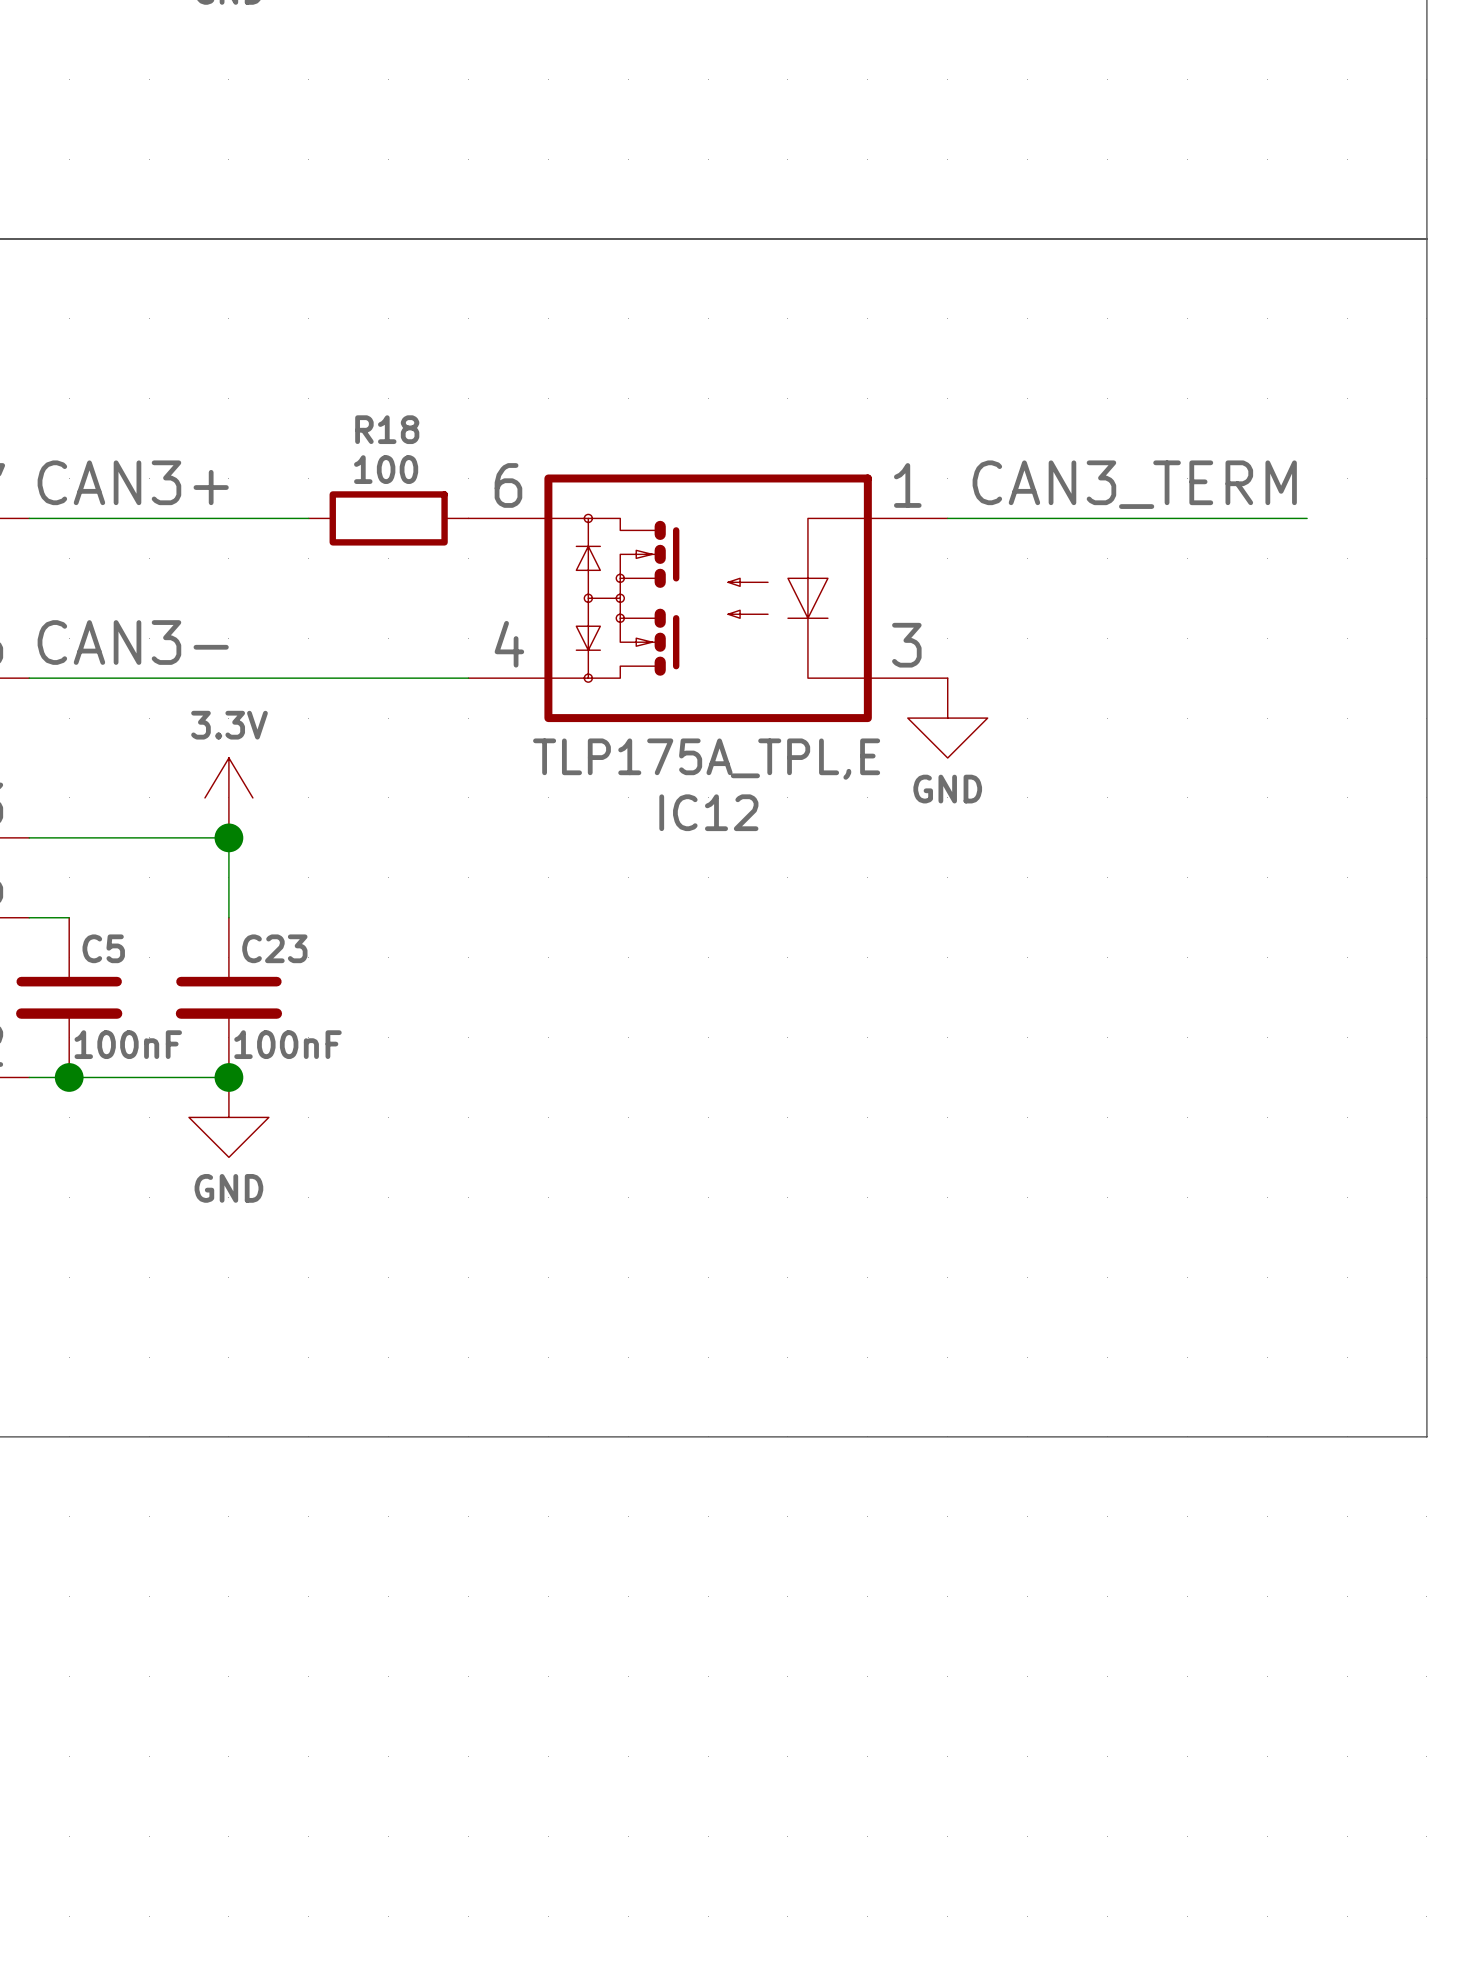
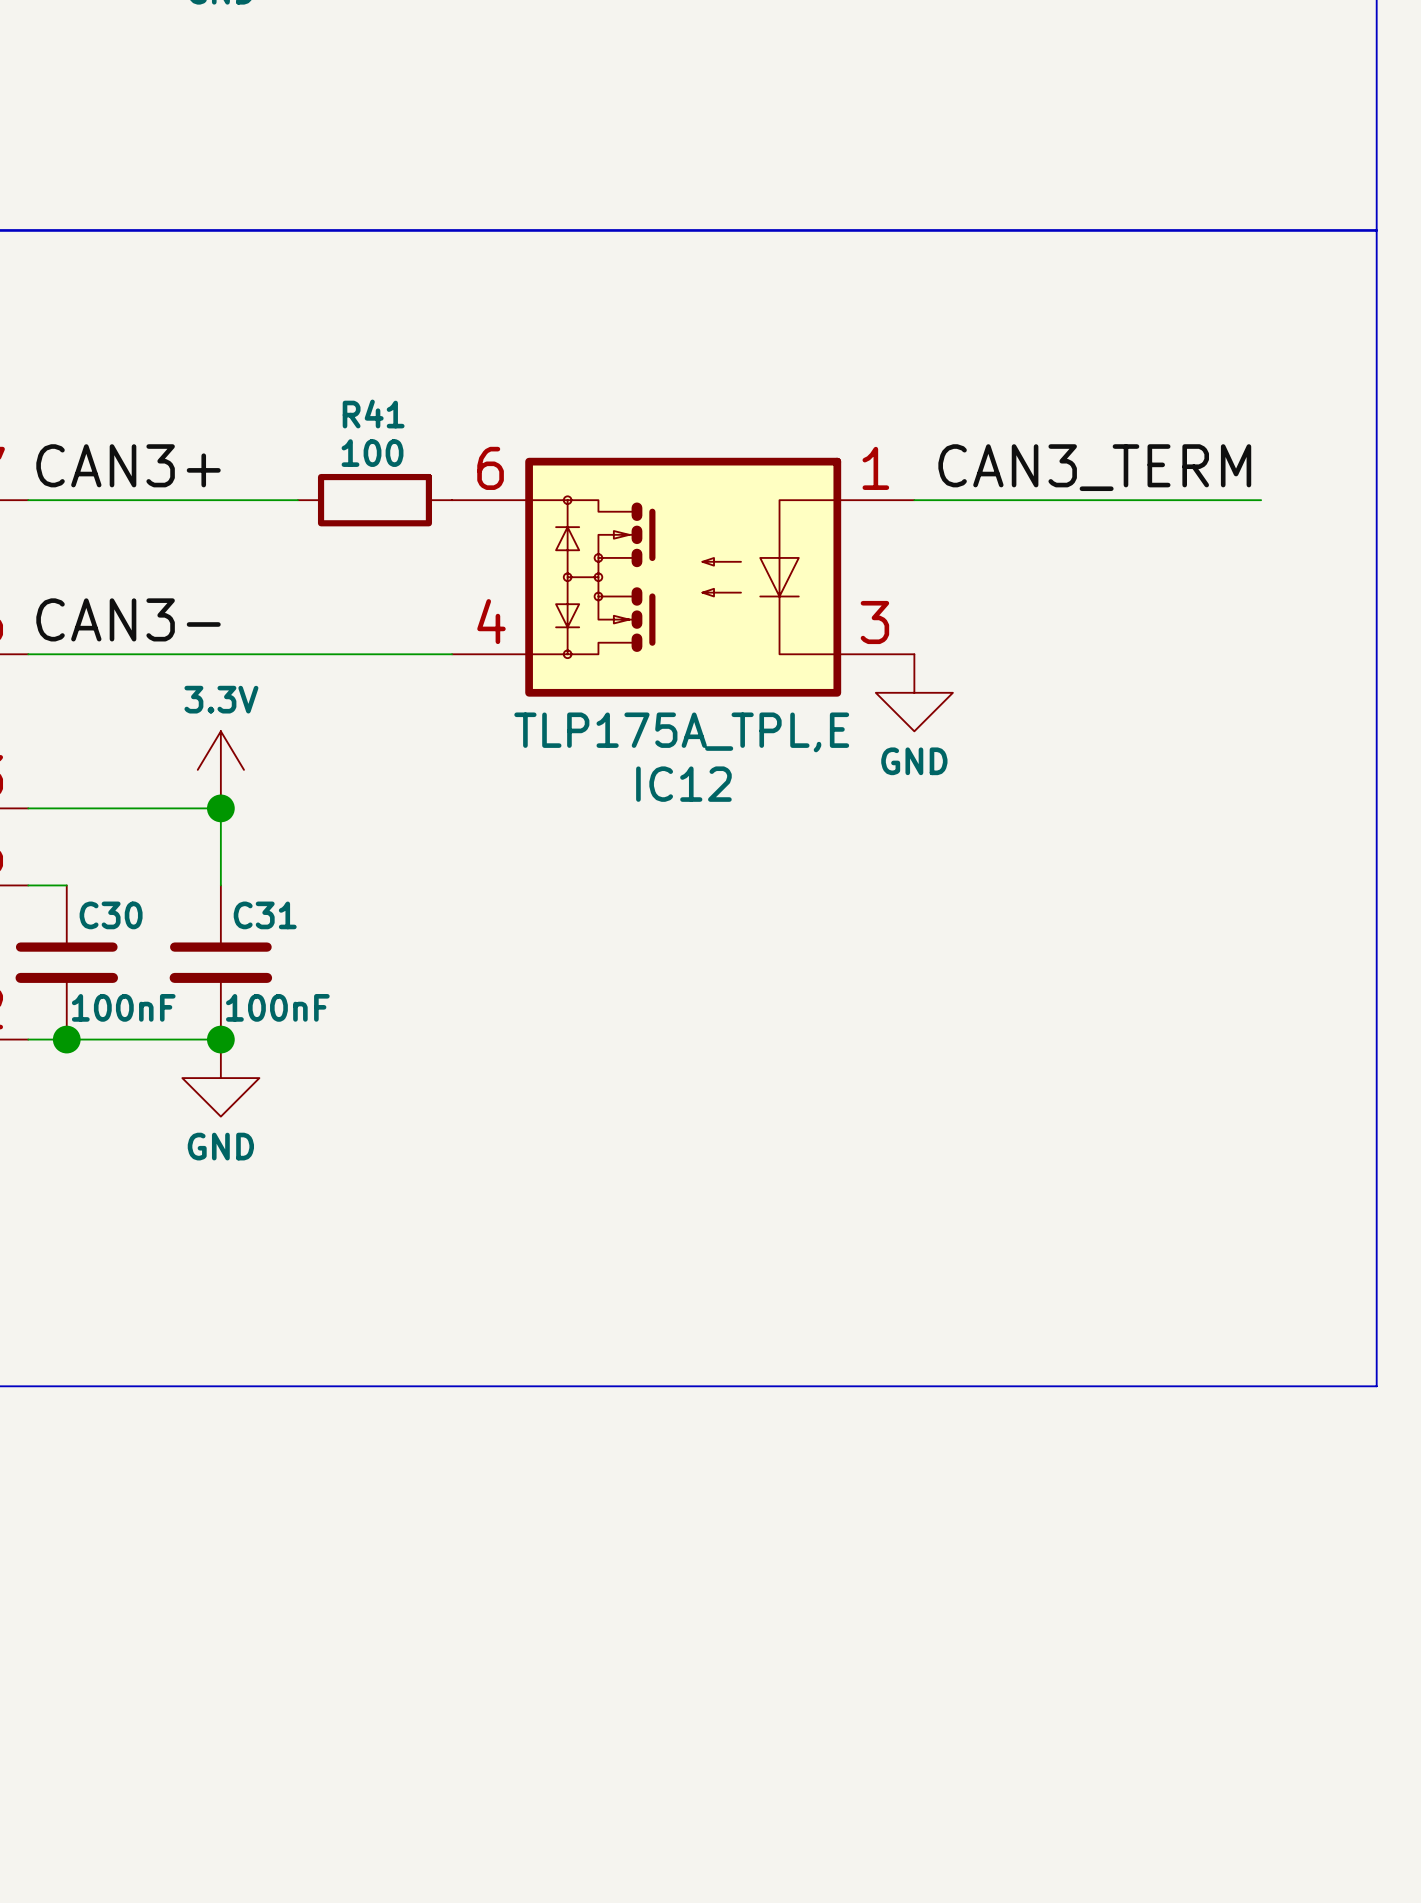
R18 name: R18 (387, 429) -> R41 (373, 413)
C5 name: C5 (103, 948) -> C30 (111, 915)
C23 name: C23 (274, 948) -> C31 (265, 915)

